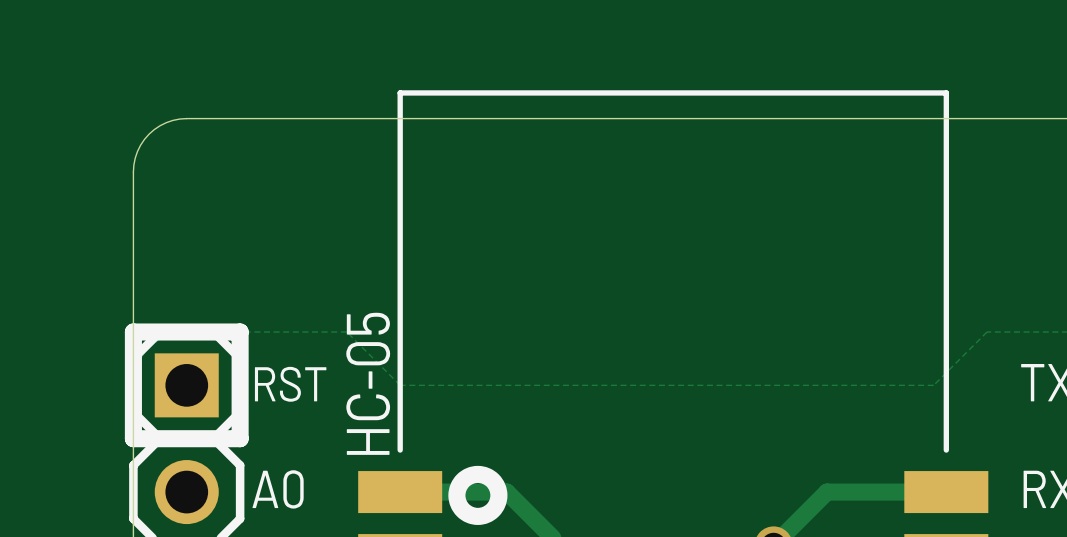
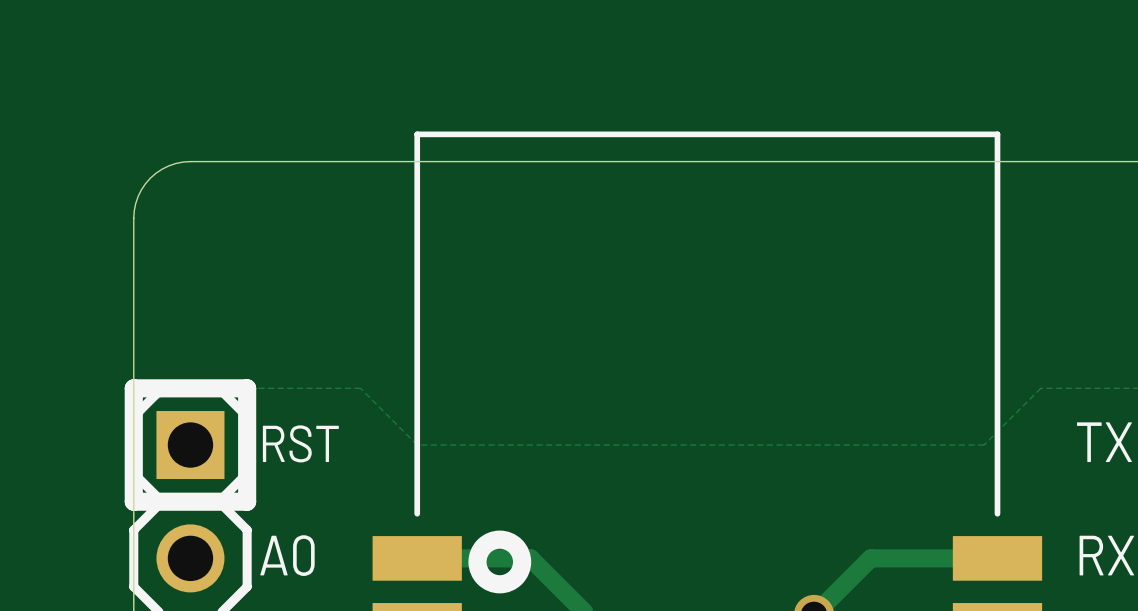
text: HC-05 (368, 383) -> none

